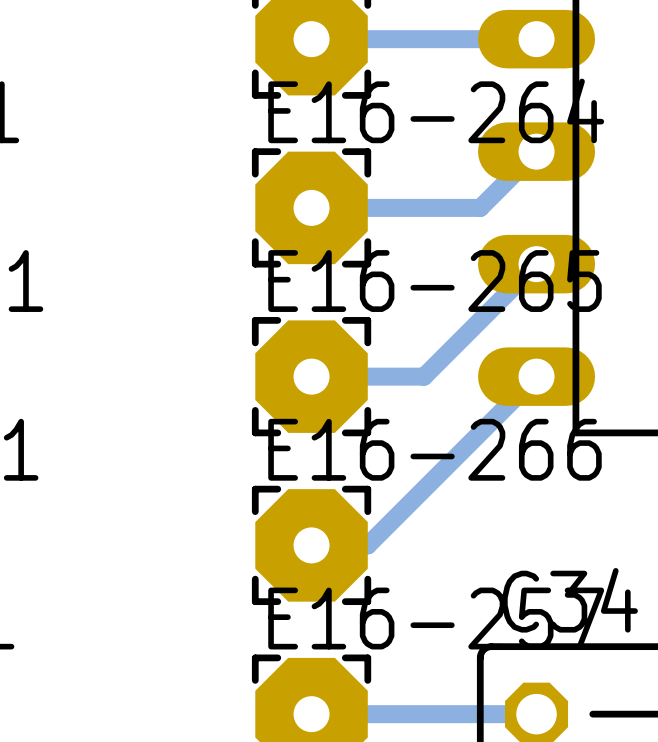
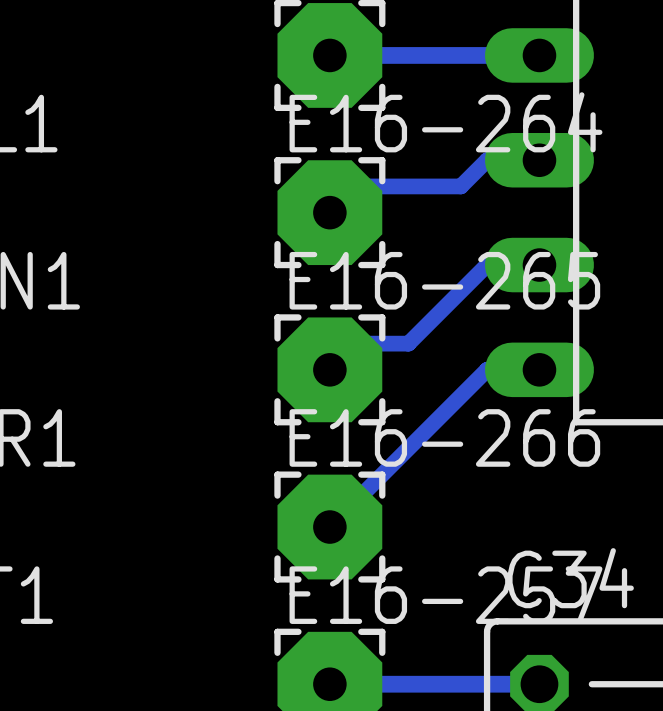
bottom track: (536, 151) (480, 207) (311, 207) -> (539, 160) (487, 160) (460, 186) (356, 186) (329, 212)
bottom track: (536, 264) (424, 376) (311, 376) -> (539, 265) (487, 265) (408, 343) (356, 343) (329, 369)
bottom track: (536, 376) (367, 545) (311, 545) -> (539, 369) (487, 369) (329, 527)

